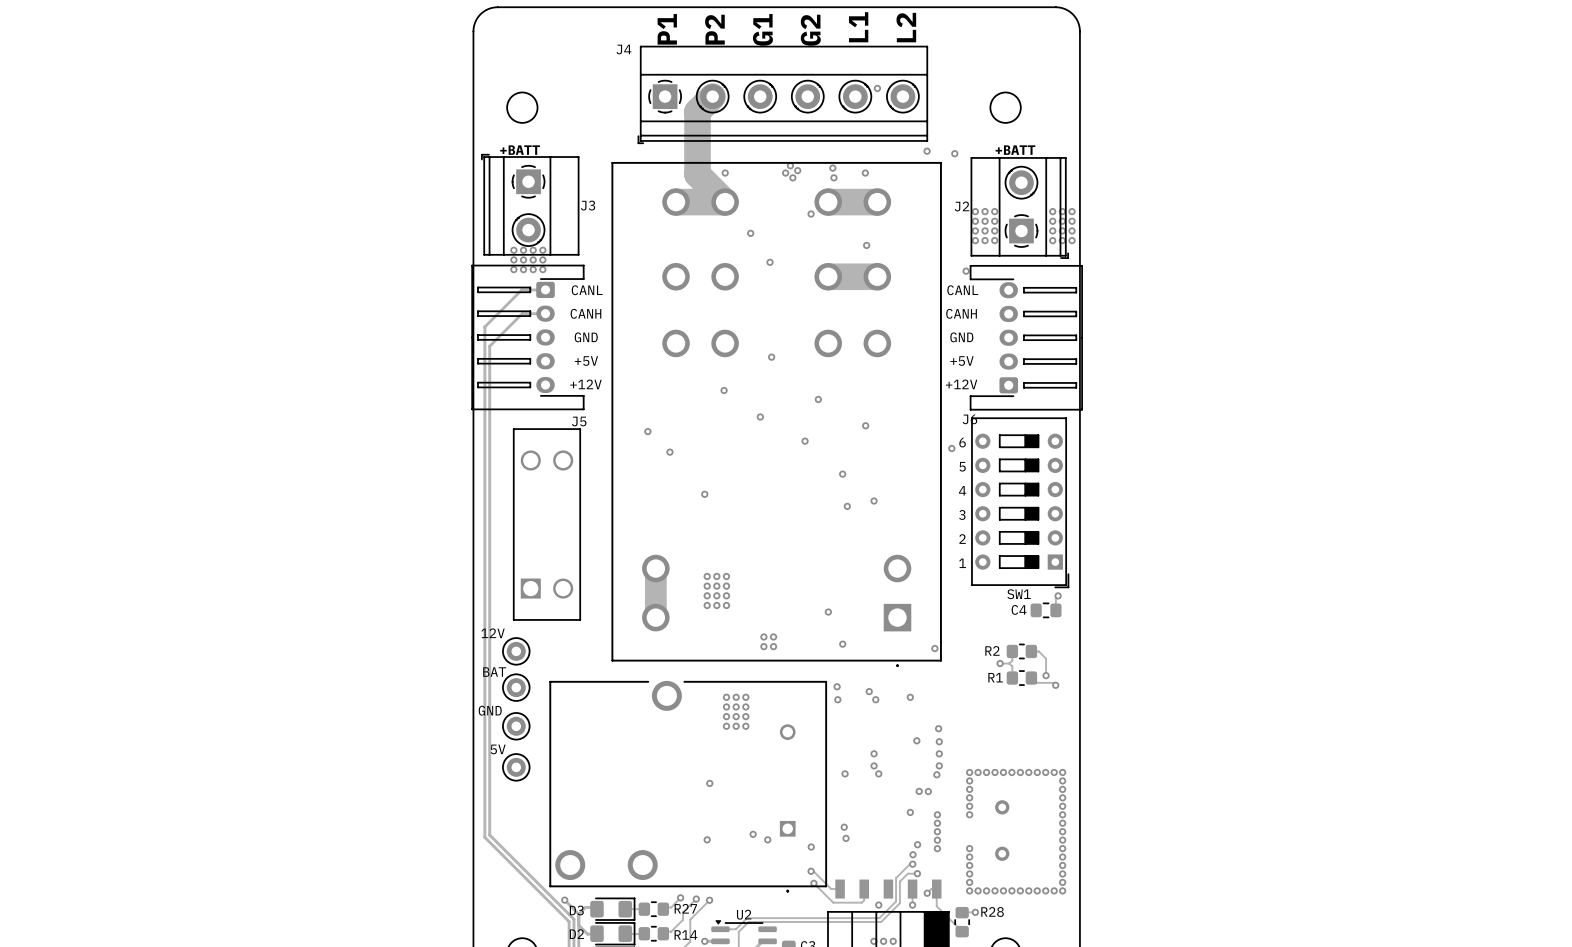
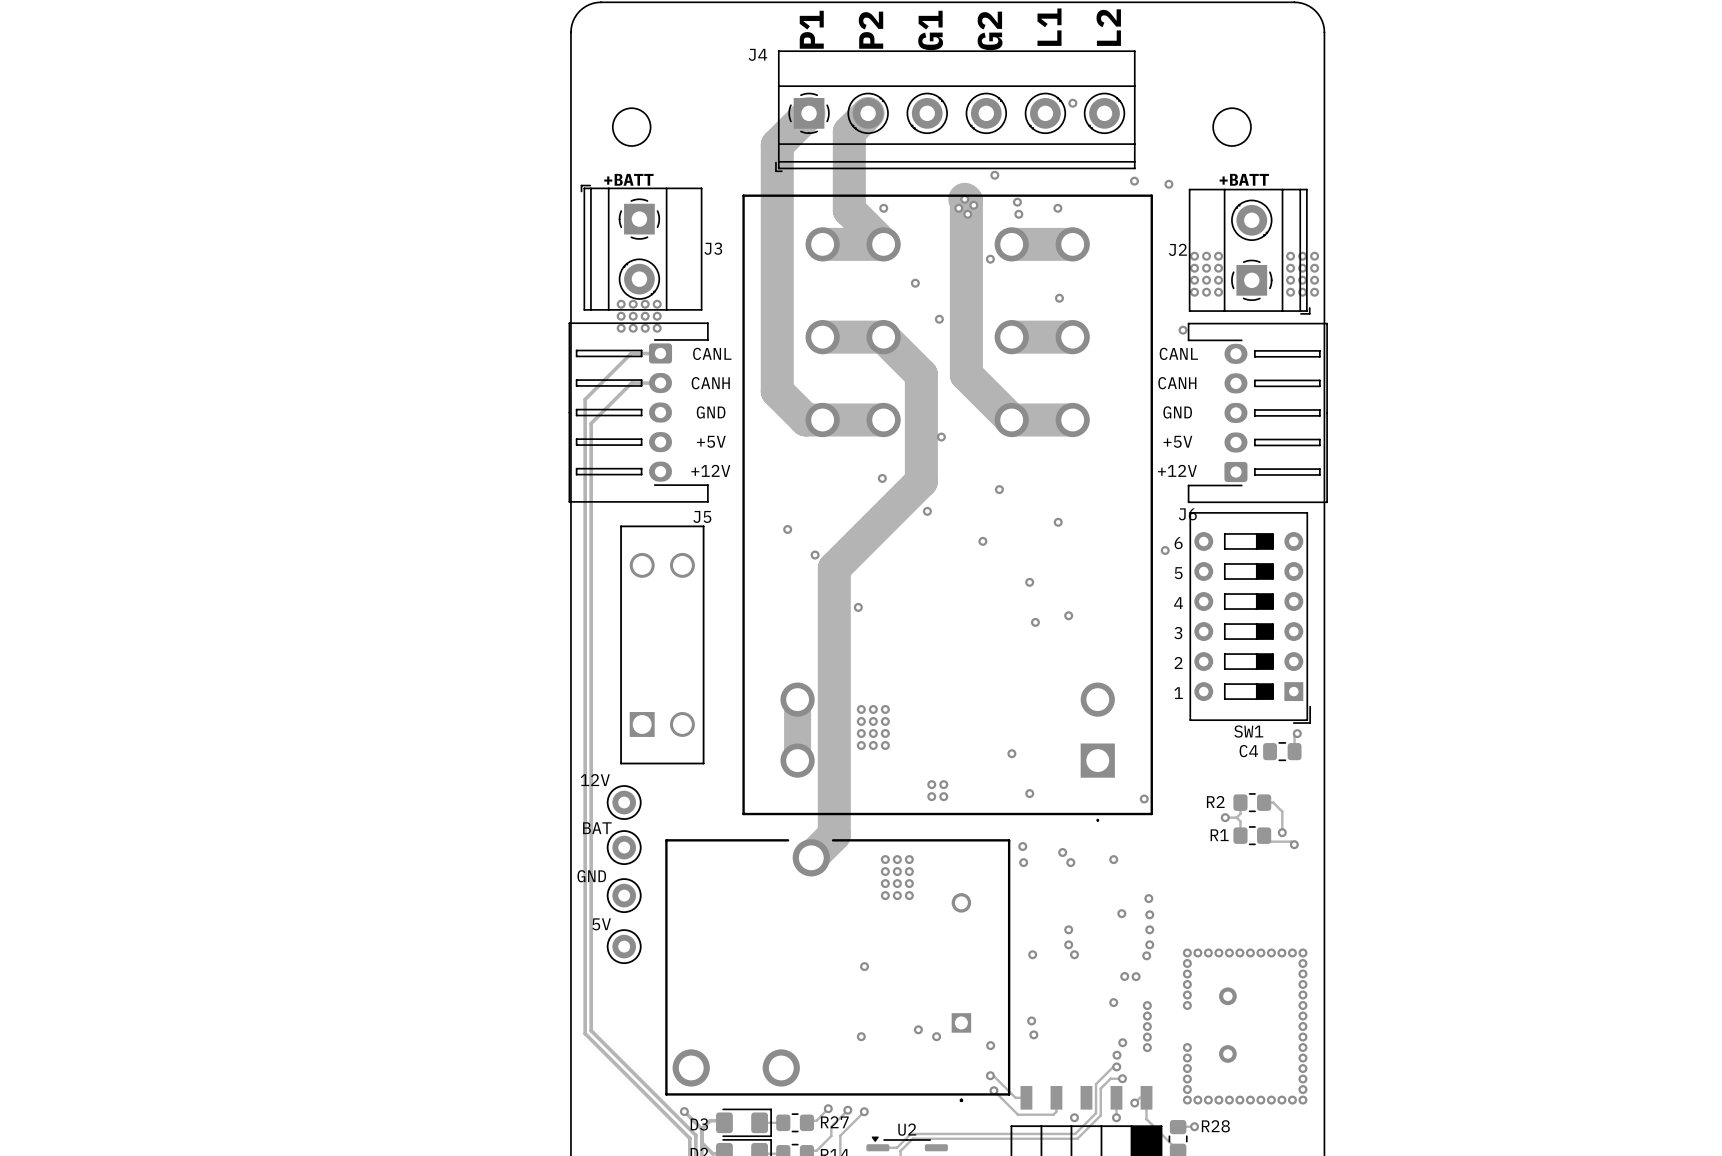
track: none -> (809, 113) (777, 145) (777, 391) (806, 419) (883, 419)
via: none -> (994, 175)
track: none -> (964, 199) (966, 200) (966, 374) (1011, 419) (1072, 419)
track: none -> (822, 337) (883, 337) (921, 374) (921, 481) (834, 568) (834, 834) (811, 857)

